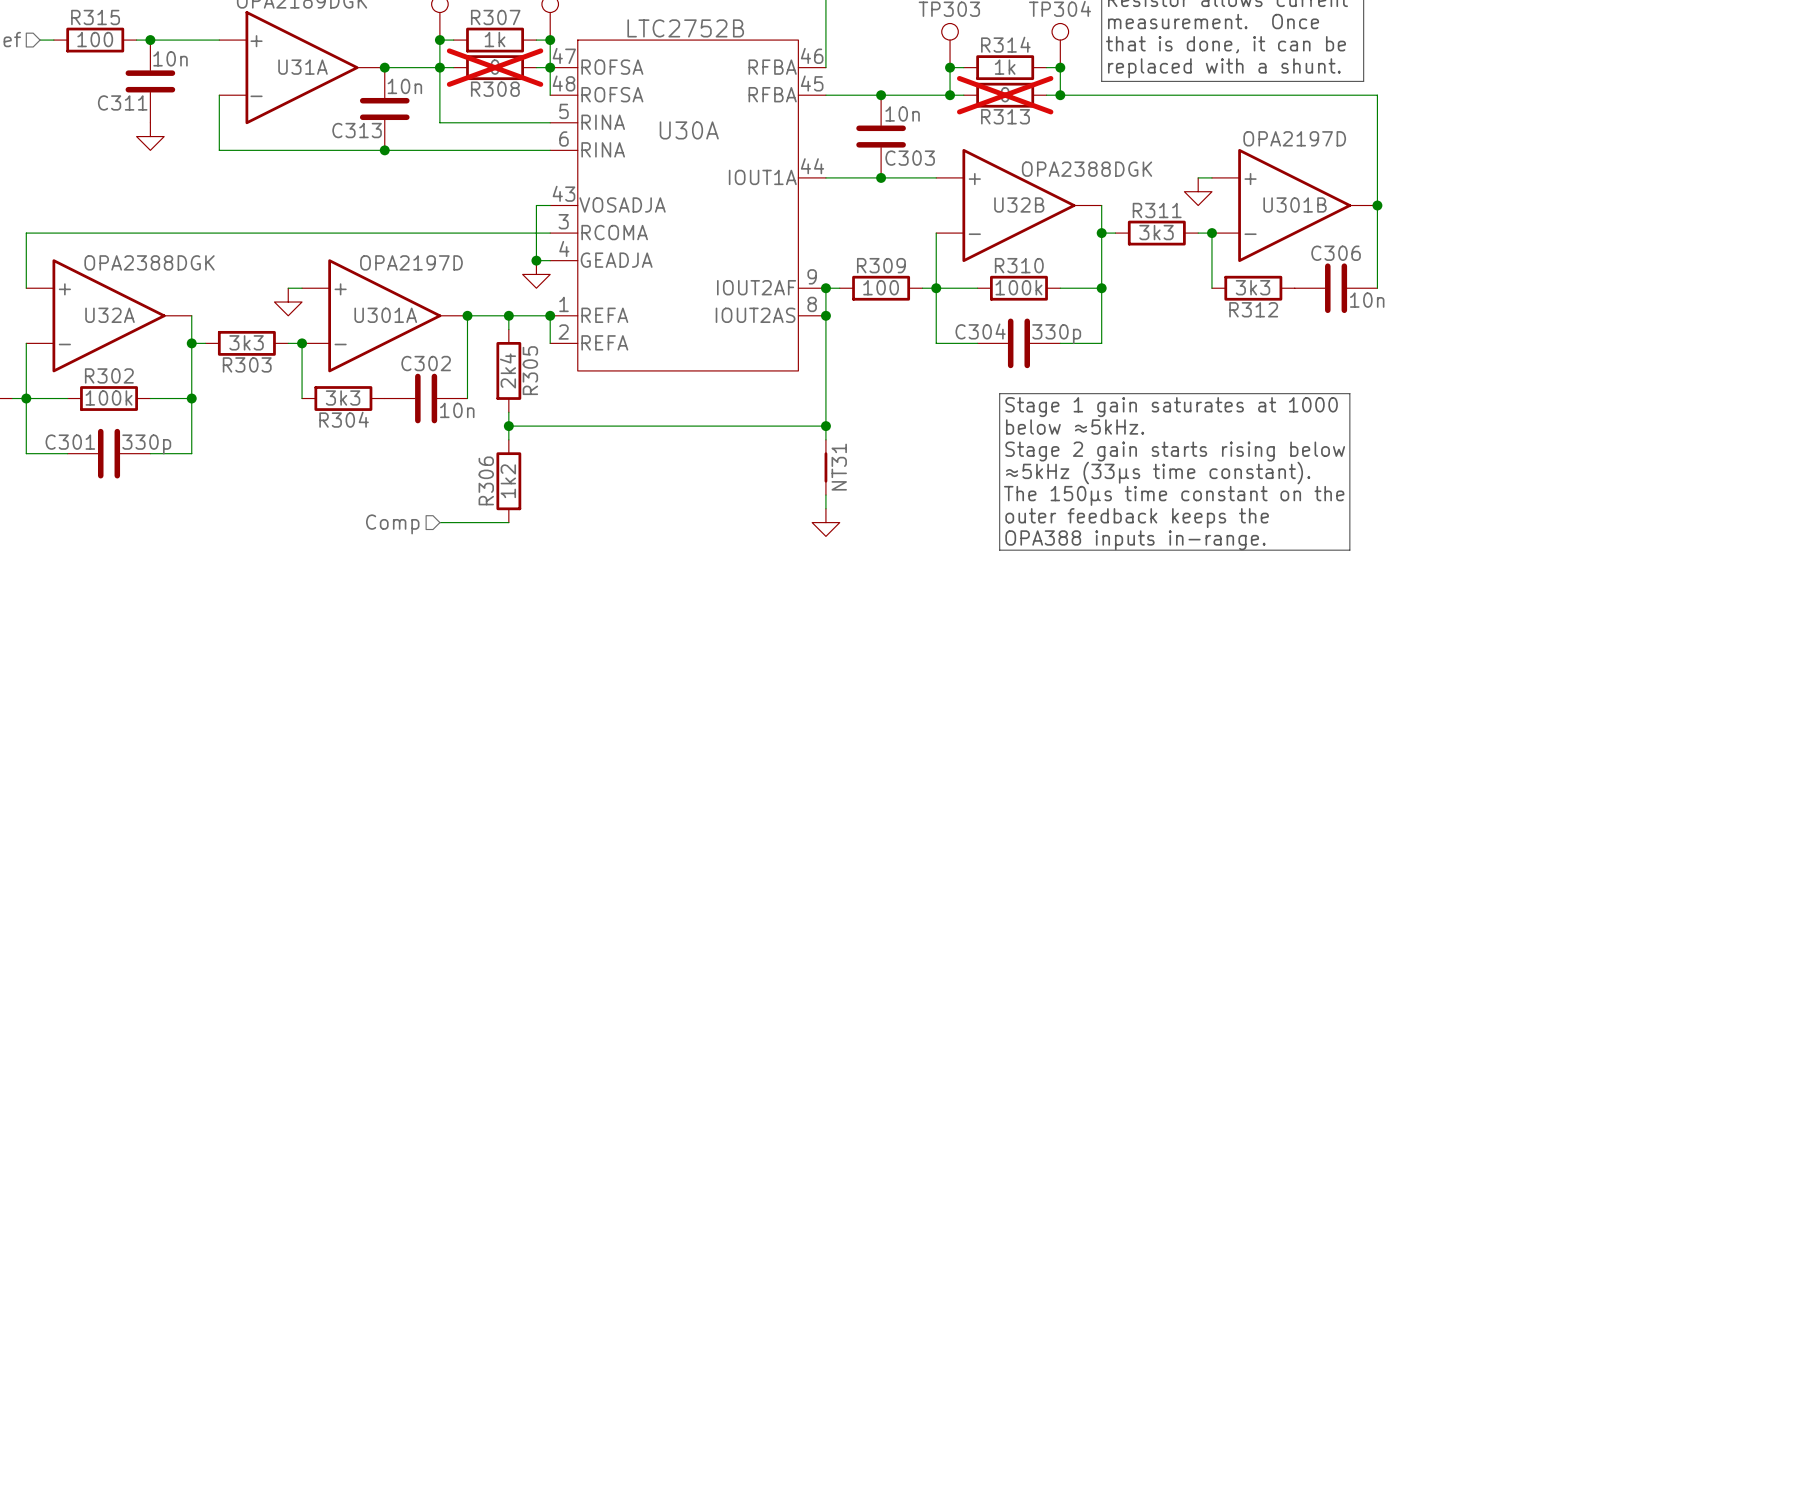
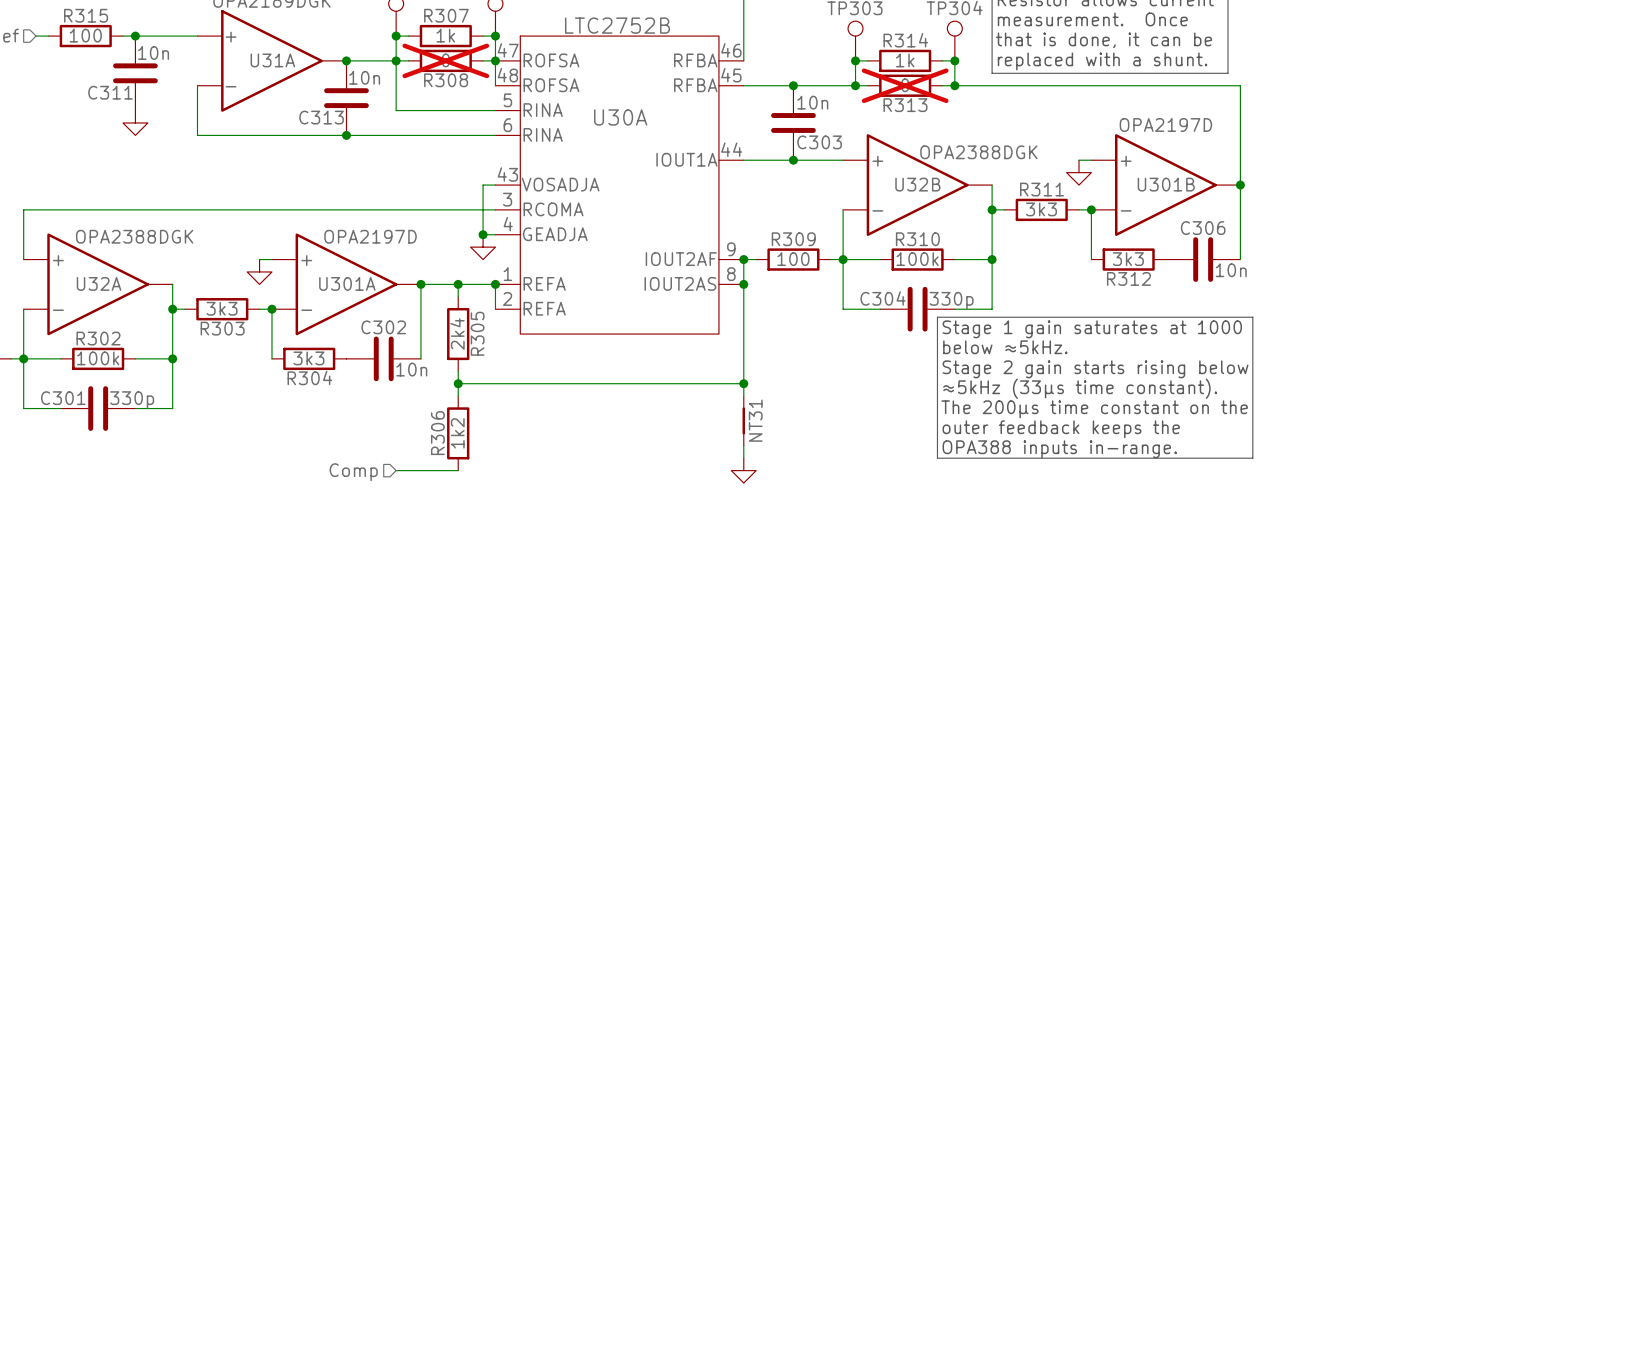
line: (999, 393) (1349, 393) (1349, 550) (999, 550) (999, 393) -> (937, 317) (1252, 317) (1252, 458) (937, 458) (937, 317)
text position: Stage 1 gain saturates at 1000 (1171, 407) -> Stage 1 gain saturates at 1000 (1092, 329)
text position: below ≈5kHz. (1075, 427) -> below ≈5kHz. (1005, 347)
text position: Stage 2 gain starts rising below (1175, 451) -> Stage 2 gain starts rising below (1095, 369)
text: none -> The 200µs time constant on the (1094, 409)
text position: ≈5kHz (33µs time constant). (1158, 473) -> ≈5kHz (33µs time constant). (1080, 388)
text: The 150µs time constant on the (1174, 495) -> none
text position: outer feedback keeps the (1137, 518) -> outer feedback keeps the (1061, 429)
text position: OPA388 inputs in-range. (1135, 540) -> OPA388 inputs in-range. (1059, 449)

